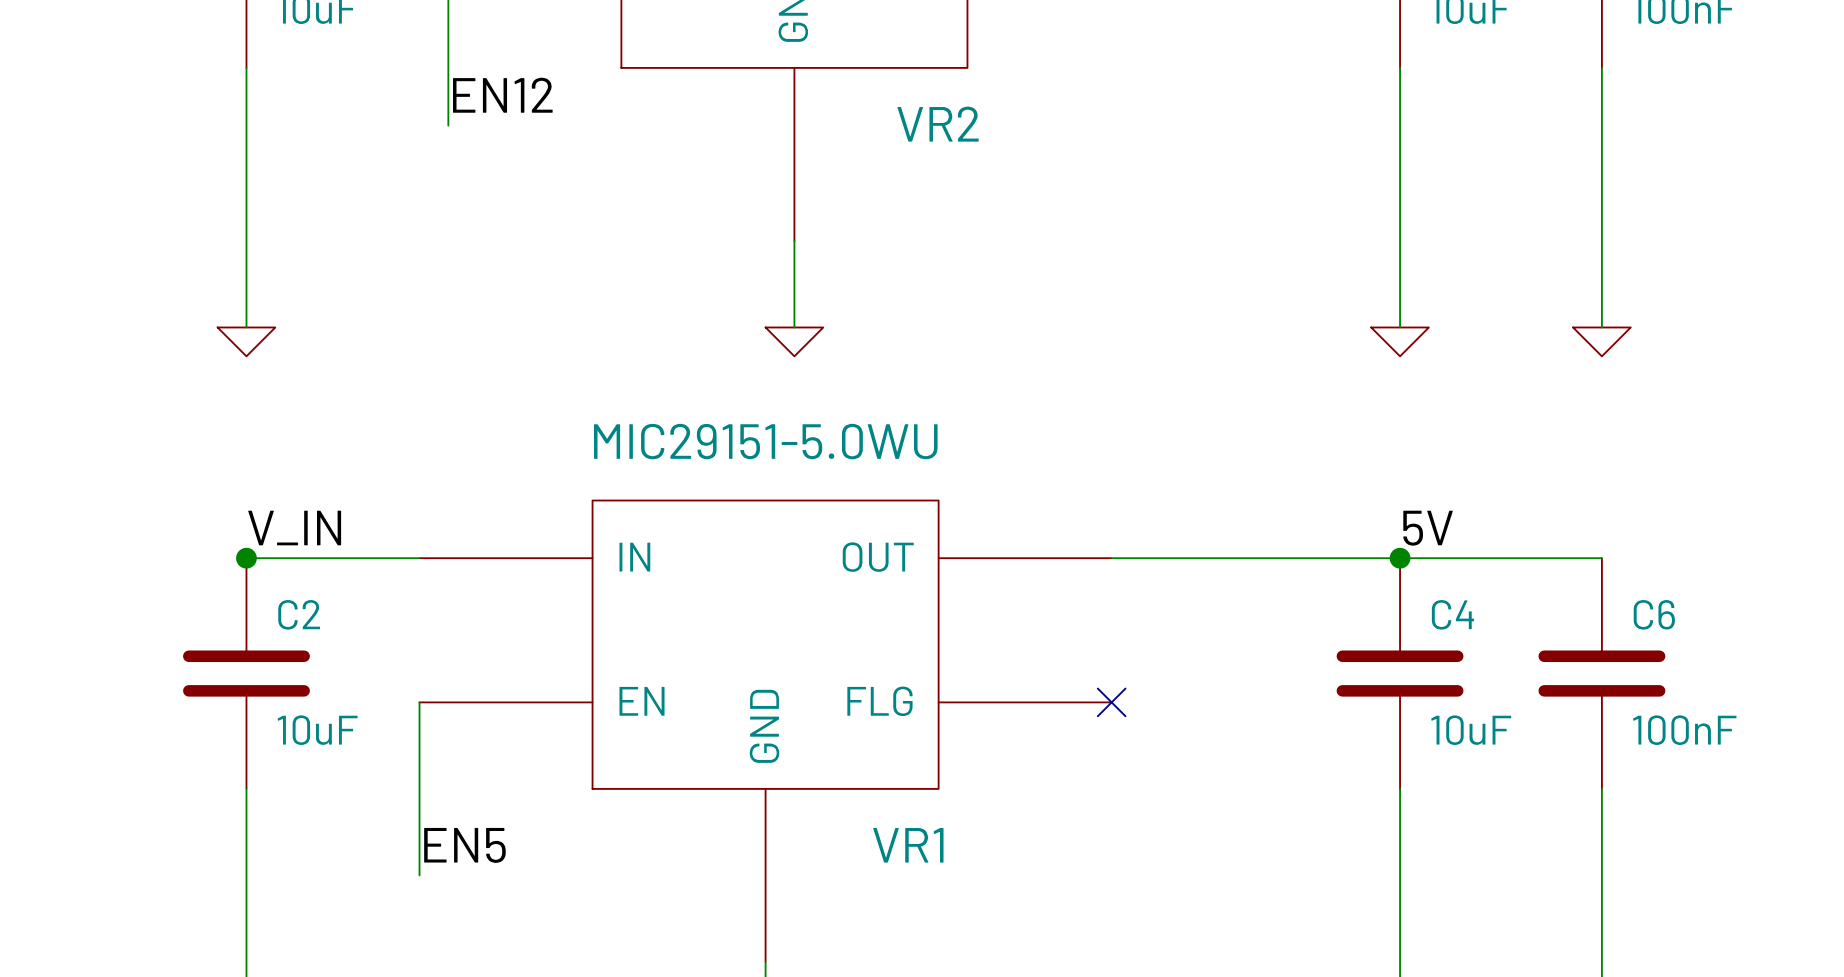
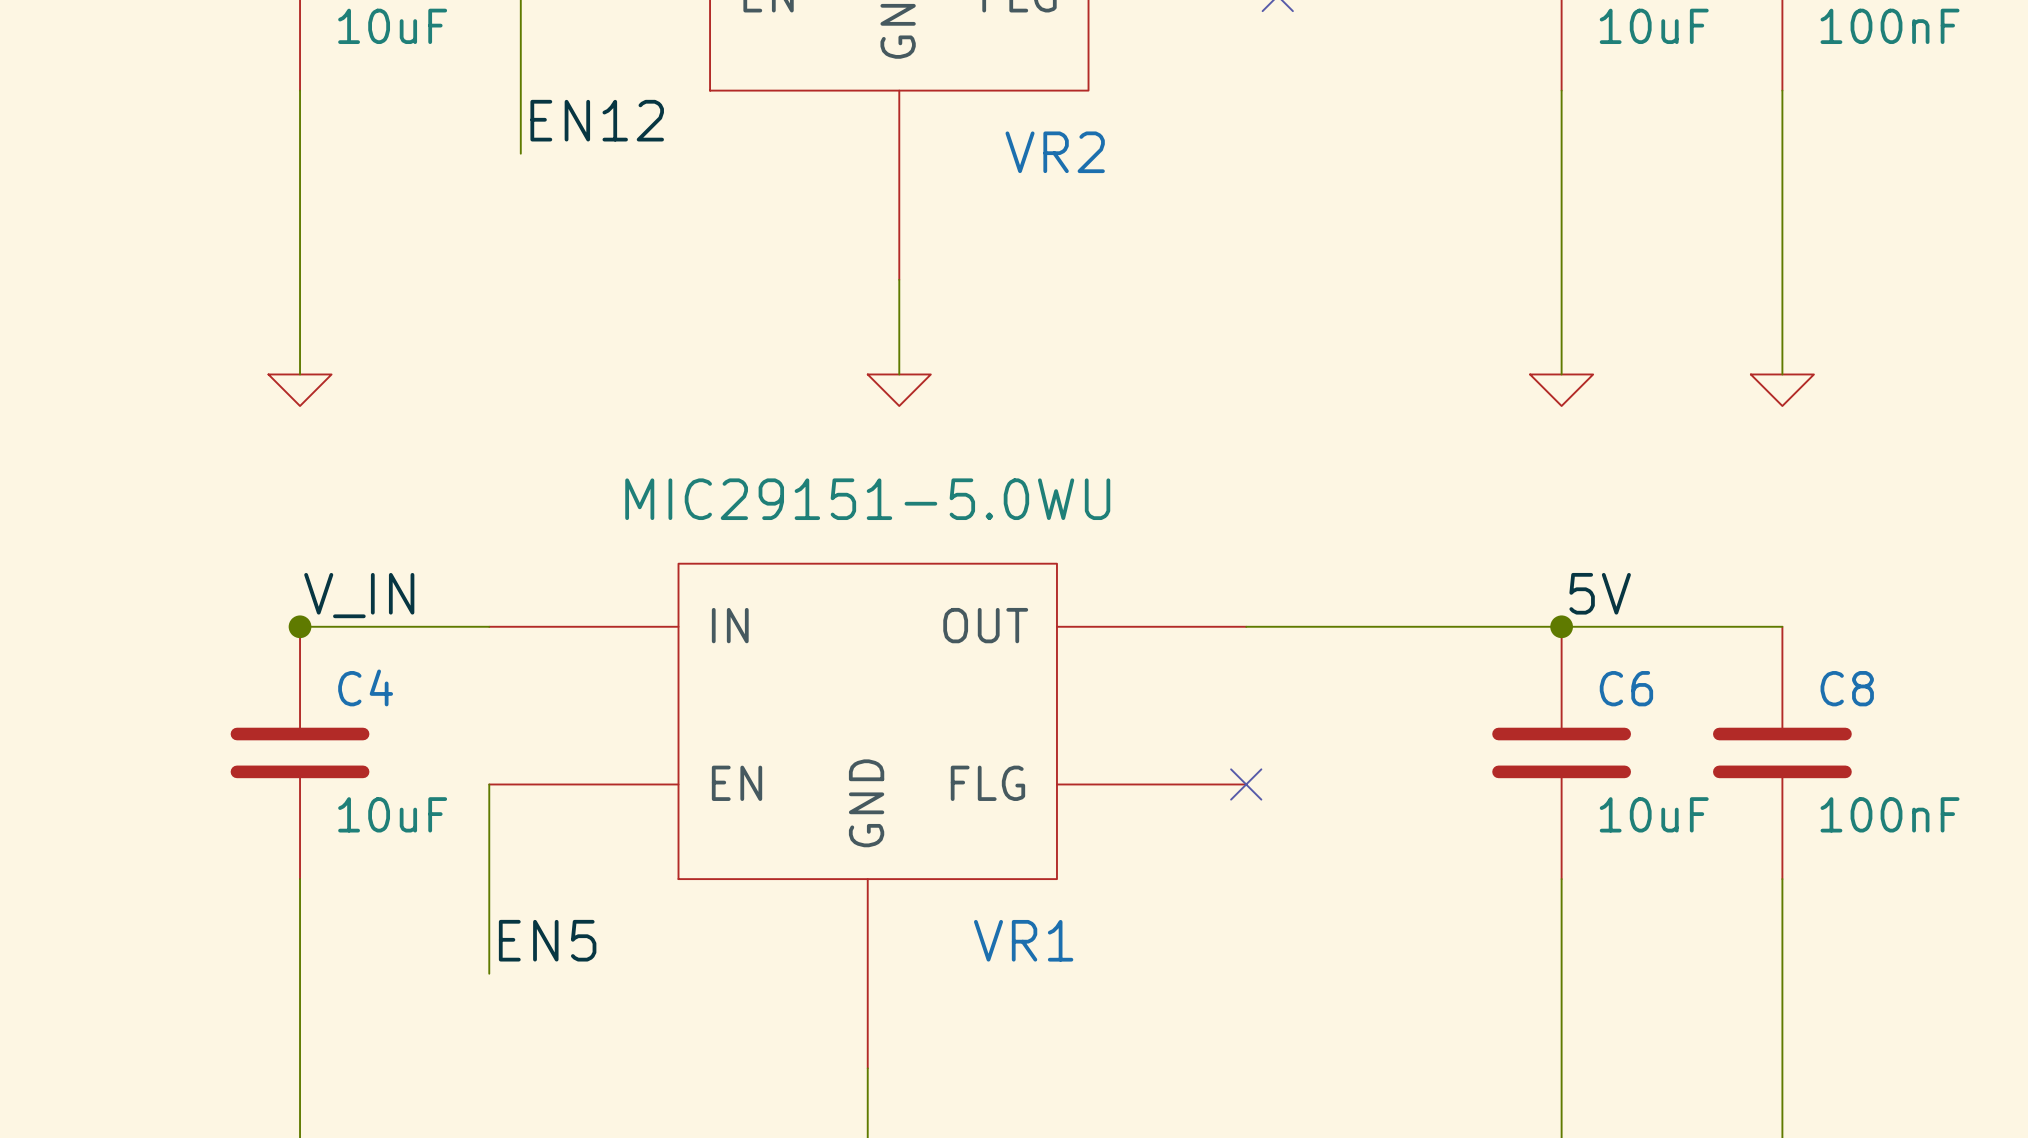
C2 name: C2 (299, 614) -> C4 (365, 687)
C4 name: C4 (1452, 614) -> C6 (1626, 688)
C6 name: C6 (1654, 614) -> C8 (1847, 688)

